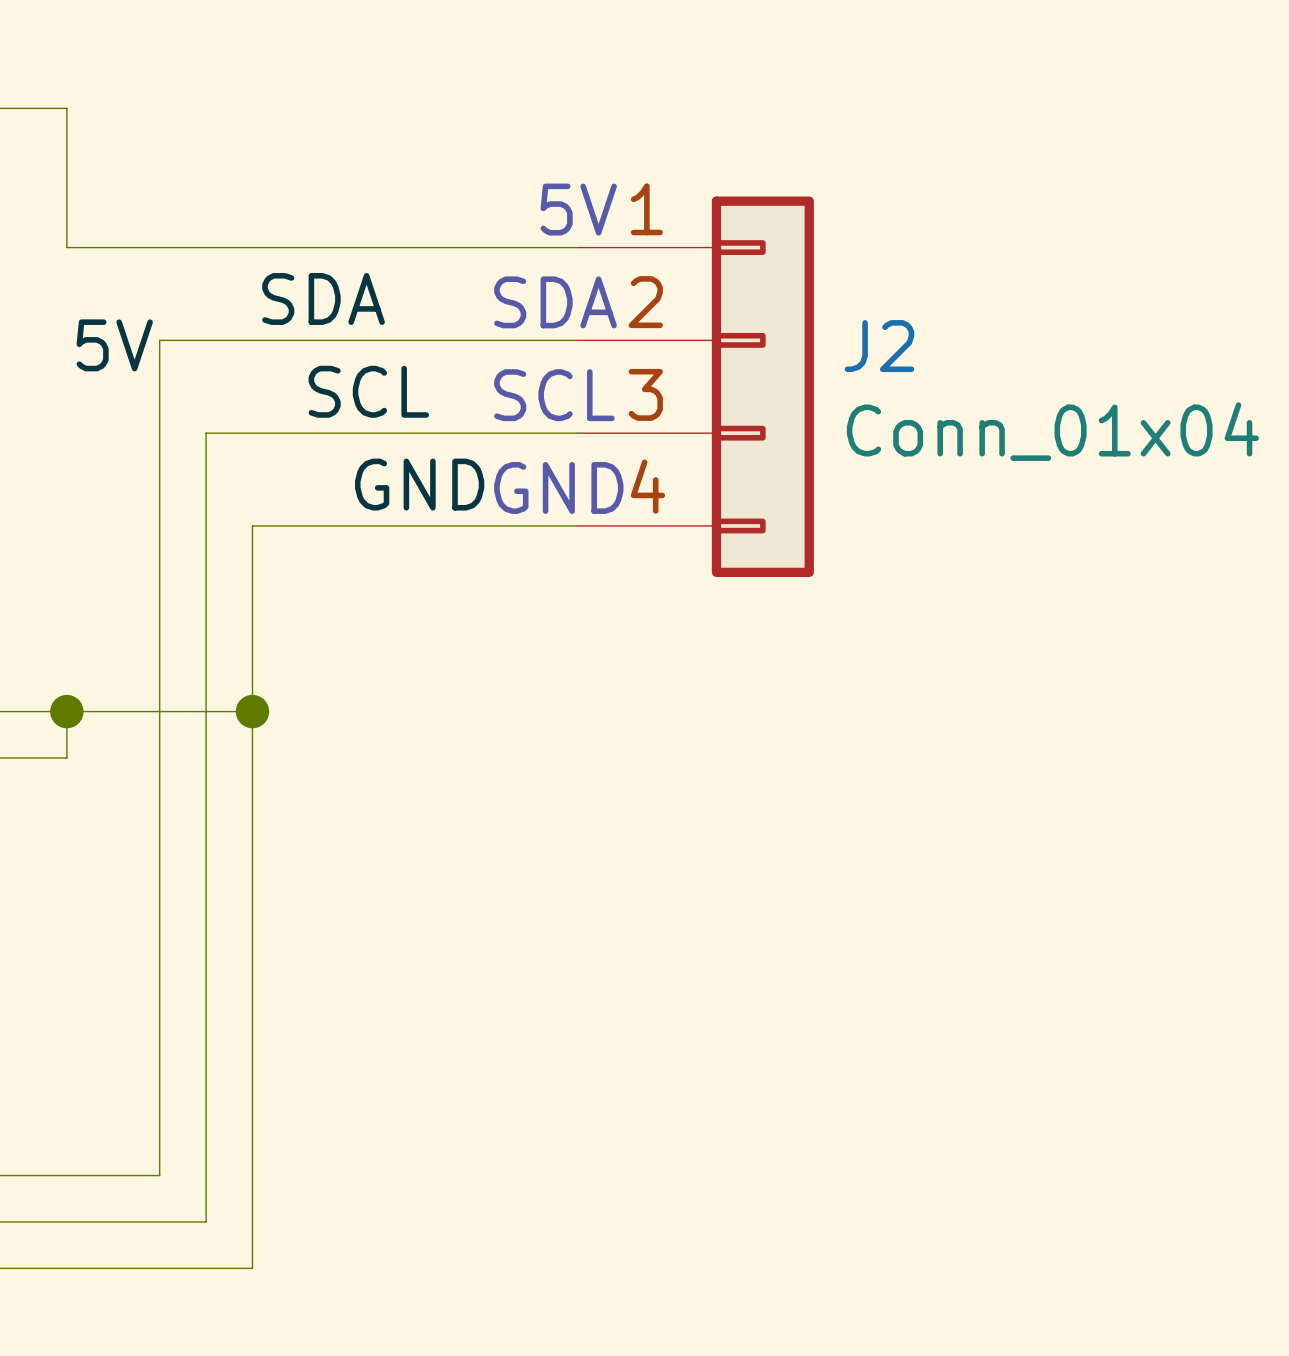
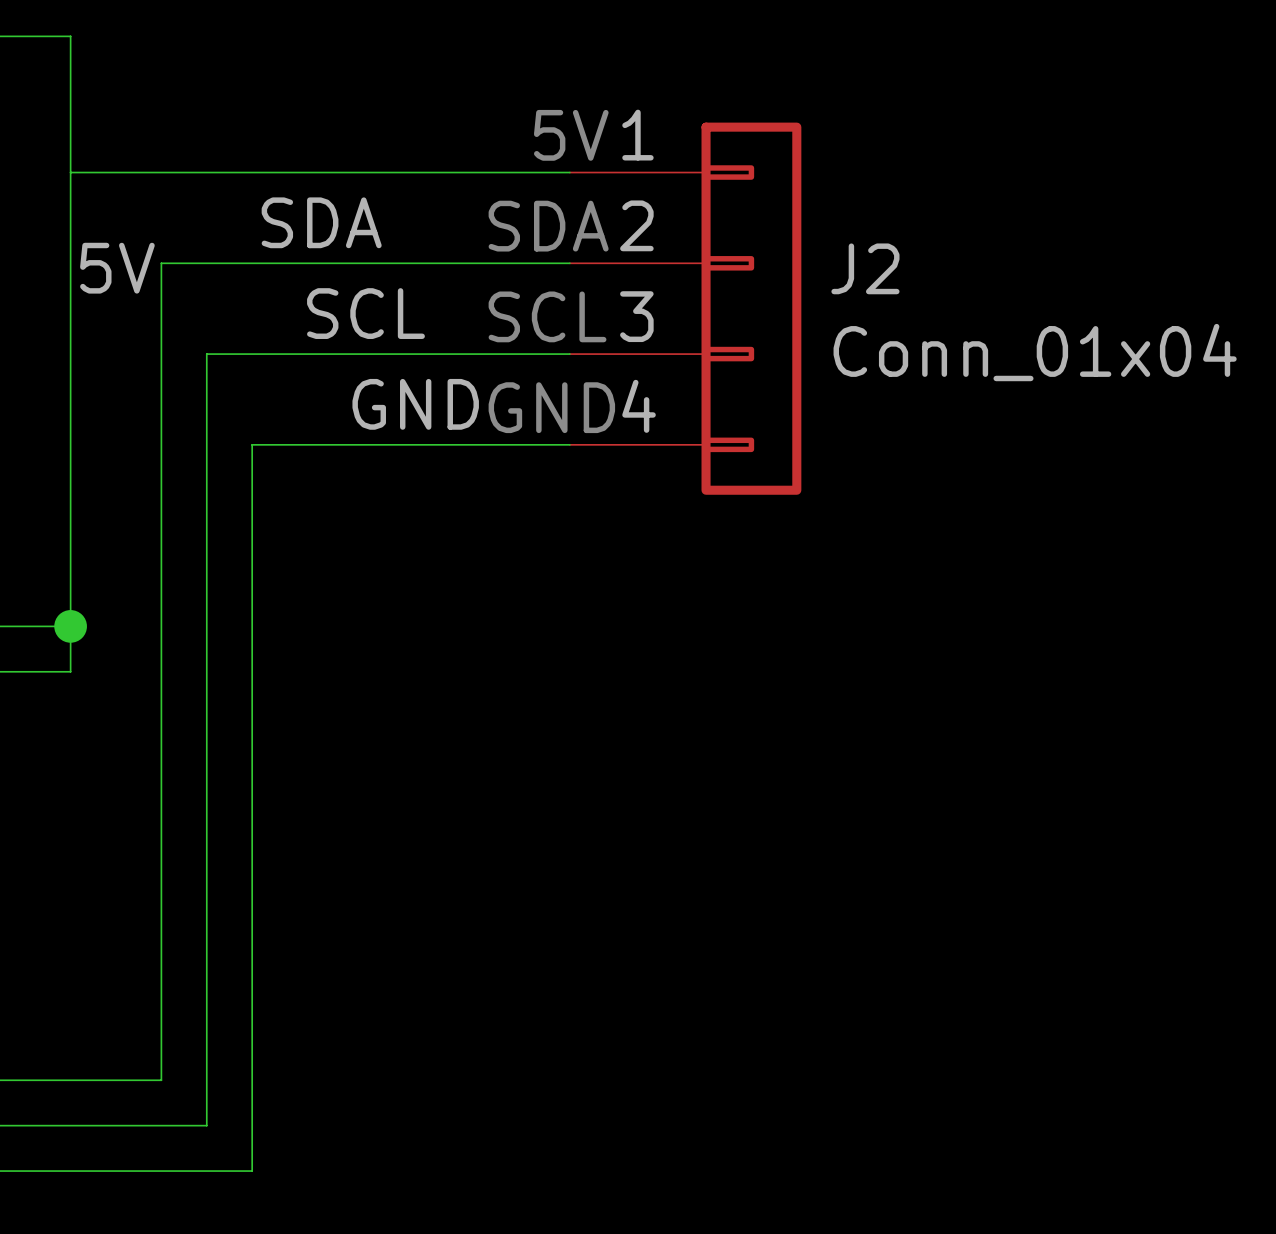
wire: (66, 711) (252, 711) -> (70, 626) (70, 172)
junction: (252, 711) -> none

